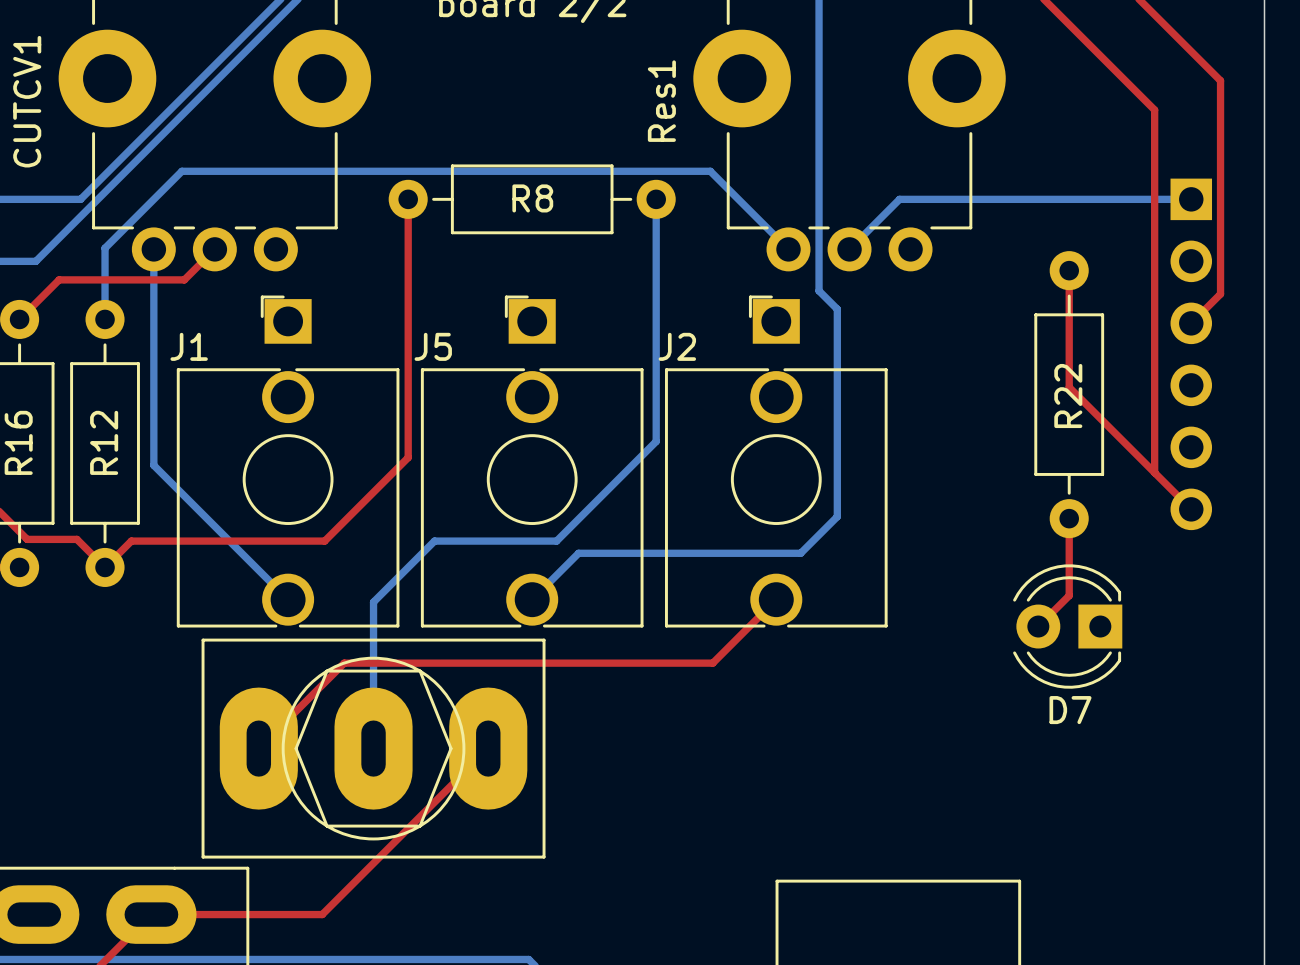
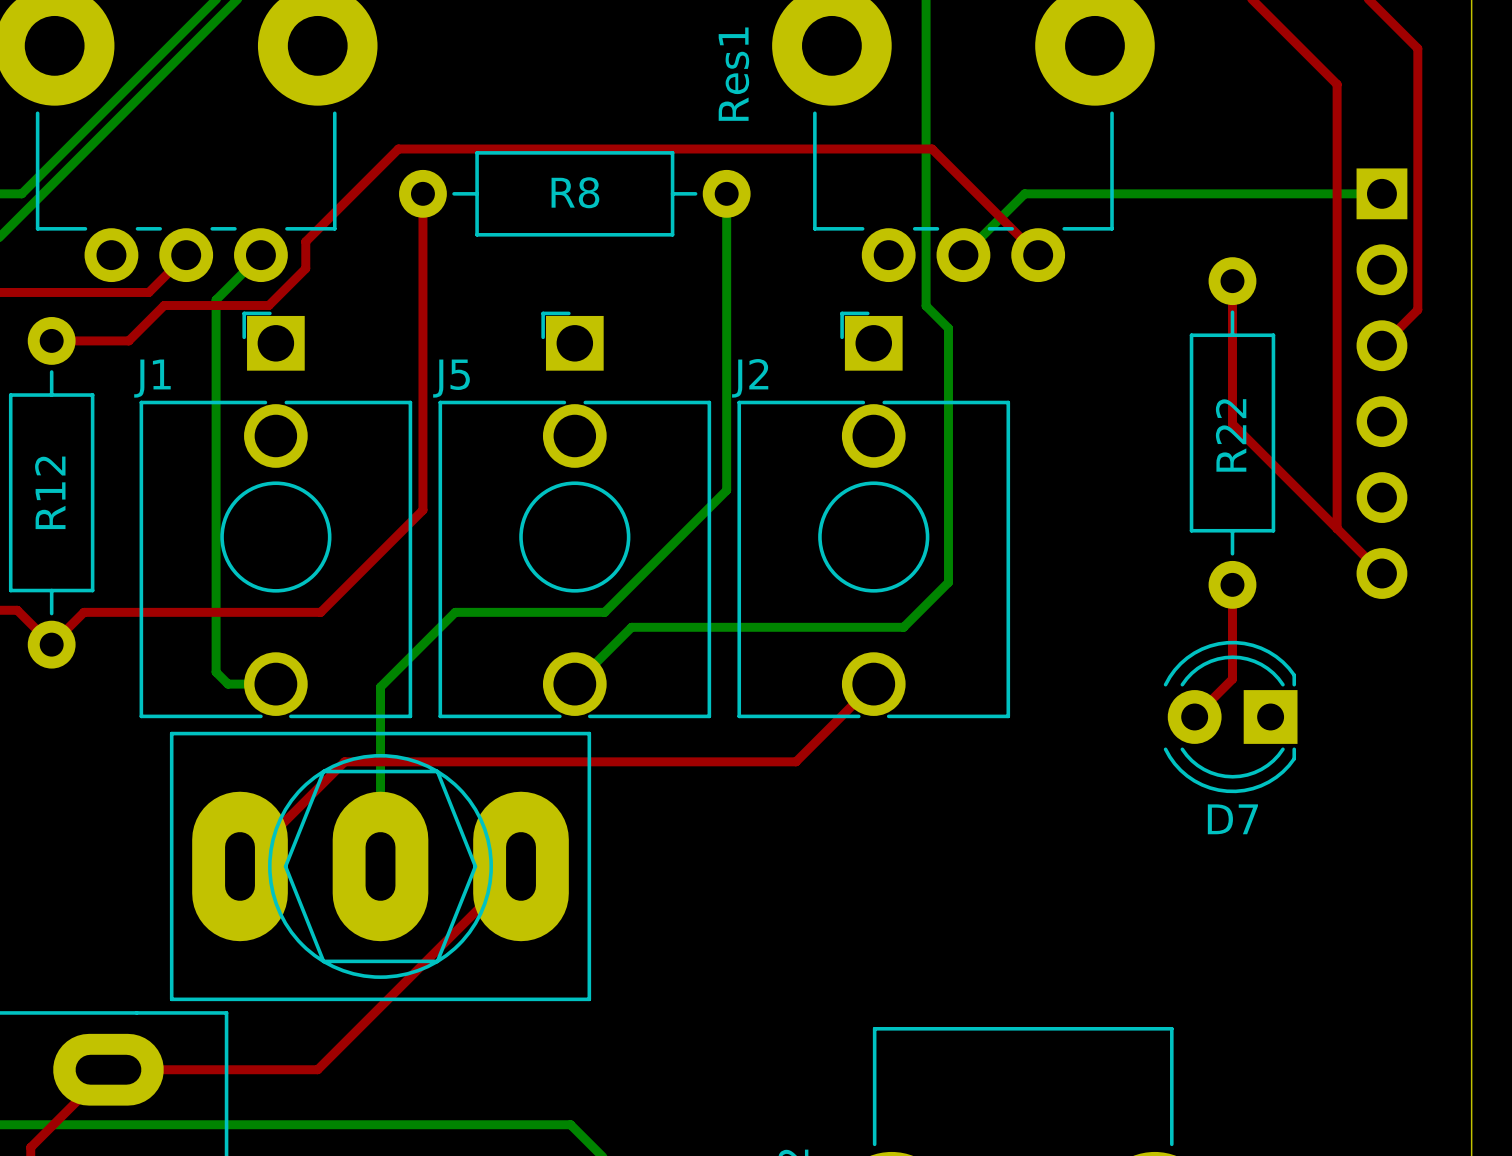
bottom track: (153, 249) (153, 465) (288, 599) -> (260, 255) (216, 299) (216, 672) (228, 684) (275, 684)
bottom track: (788, 249) (710, 171) (181, 171) (105, 248) (105, 319) -> none
top track: none -> (1038, 255) (932, 149) (398, 149) (305, 241) (305, 268) (268, 305) (164, 305) (128, 340) (51, 340)

